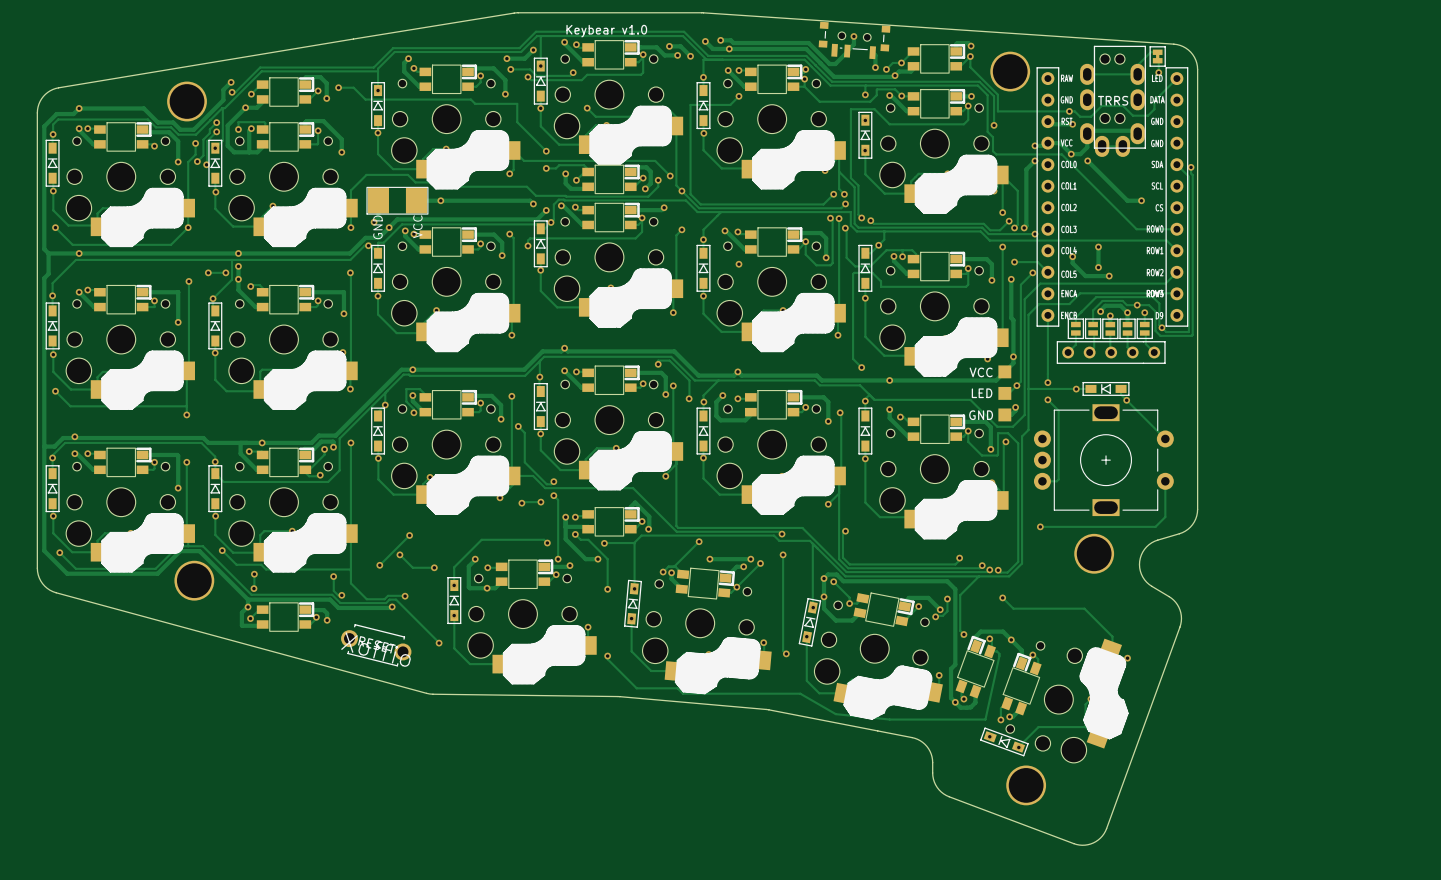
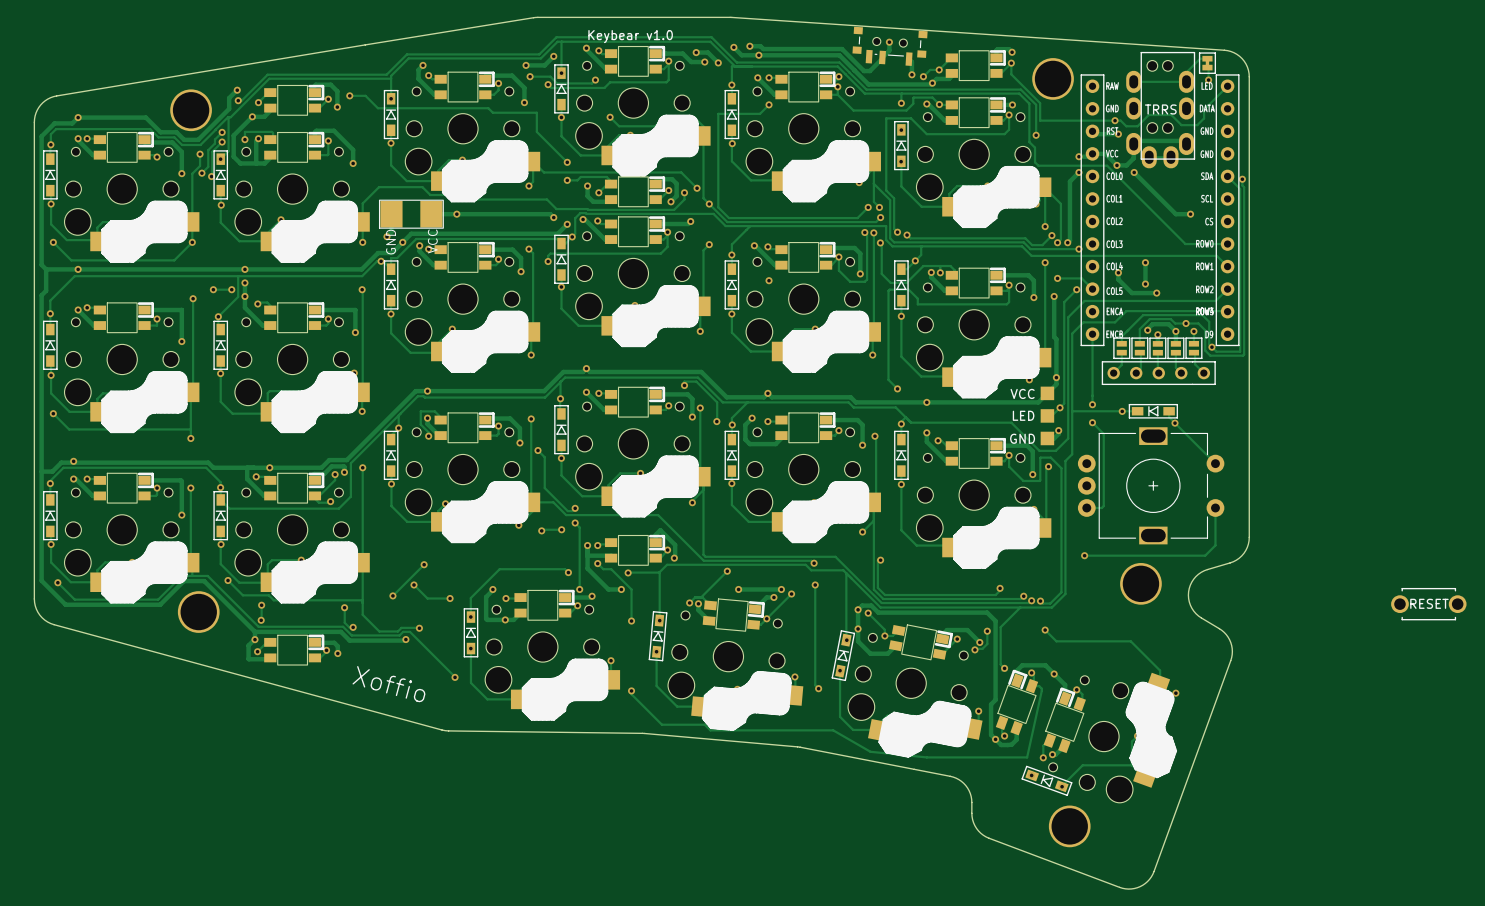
part: none -> (1428, 604)
part: (376, 645) -> none

